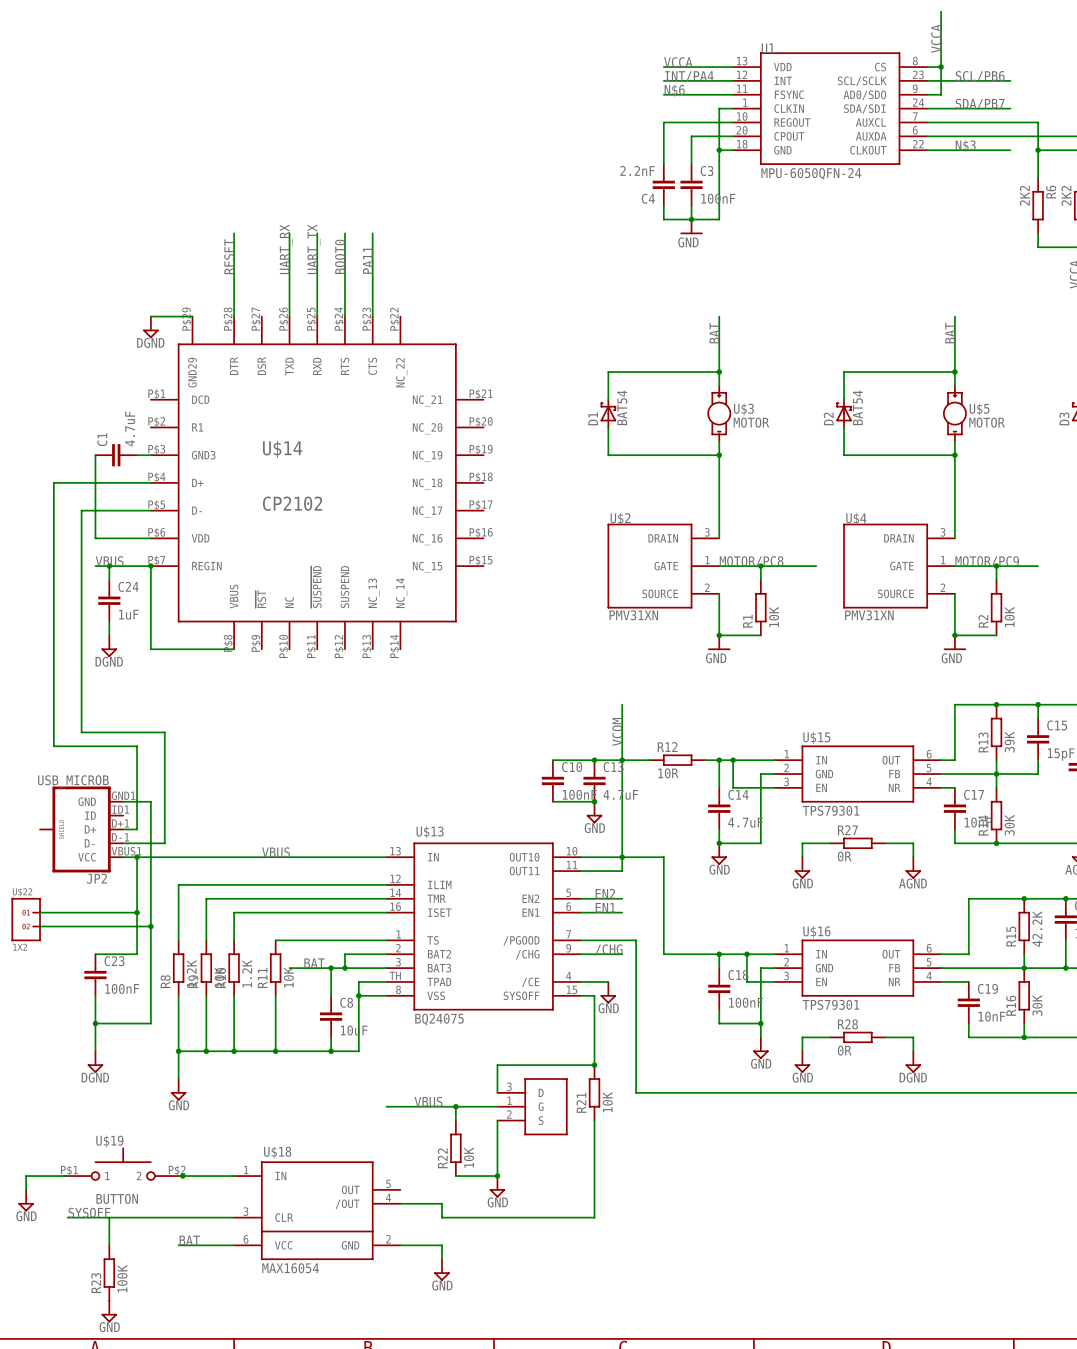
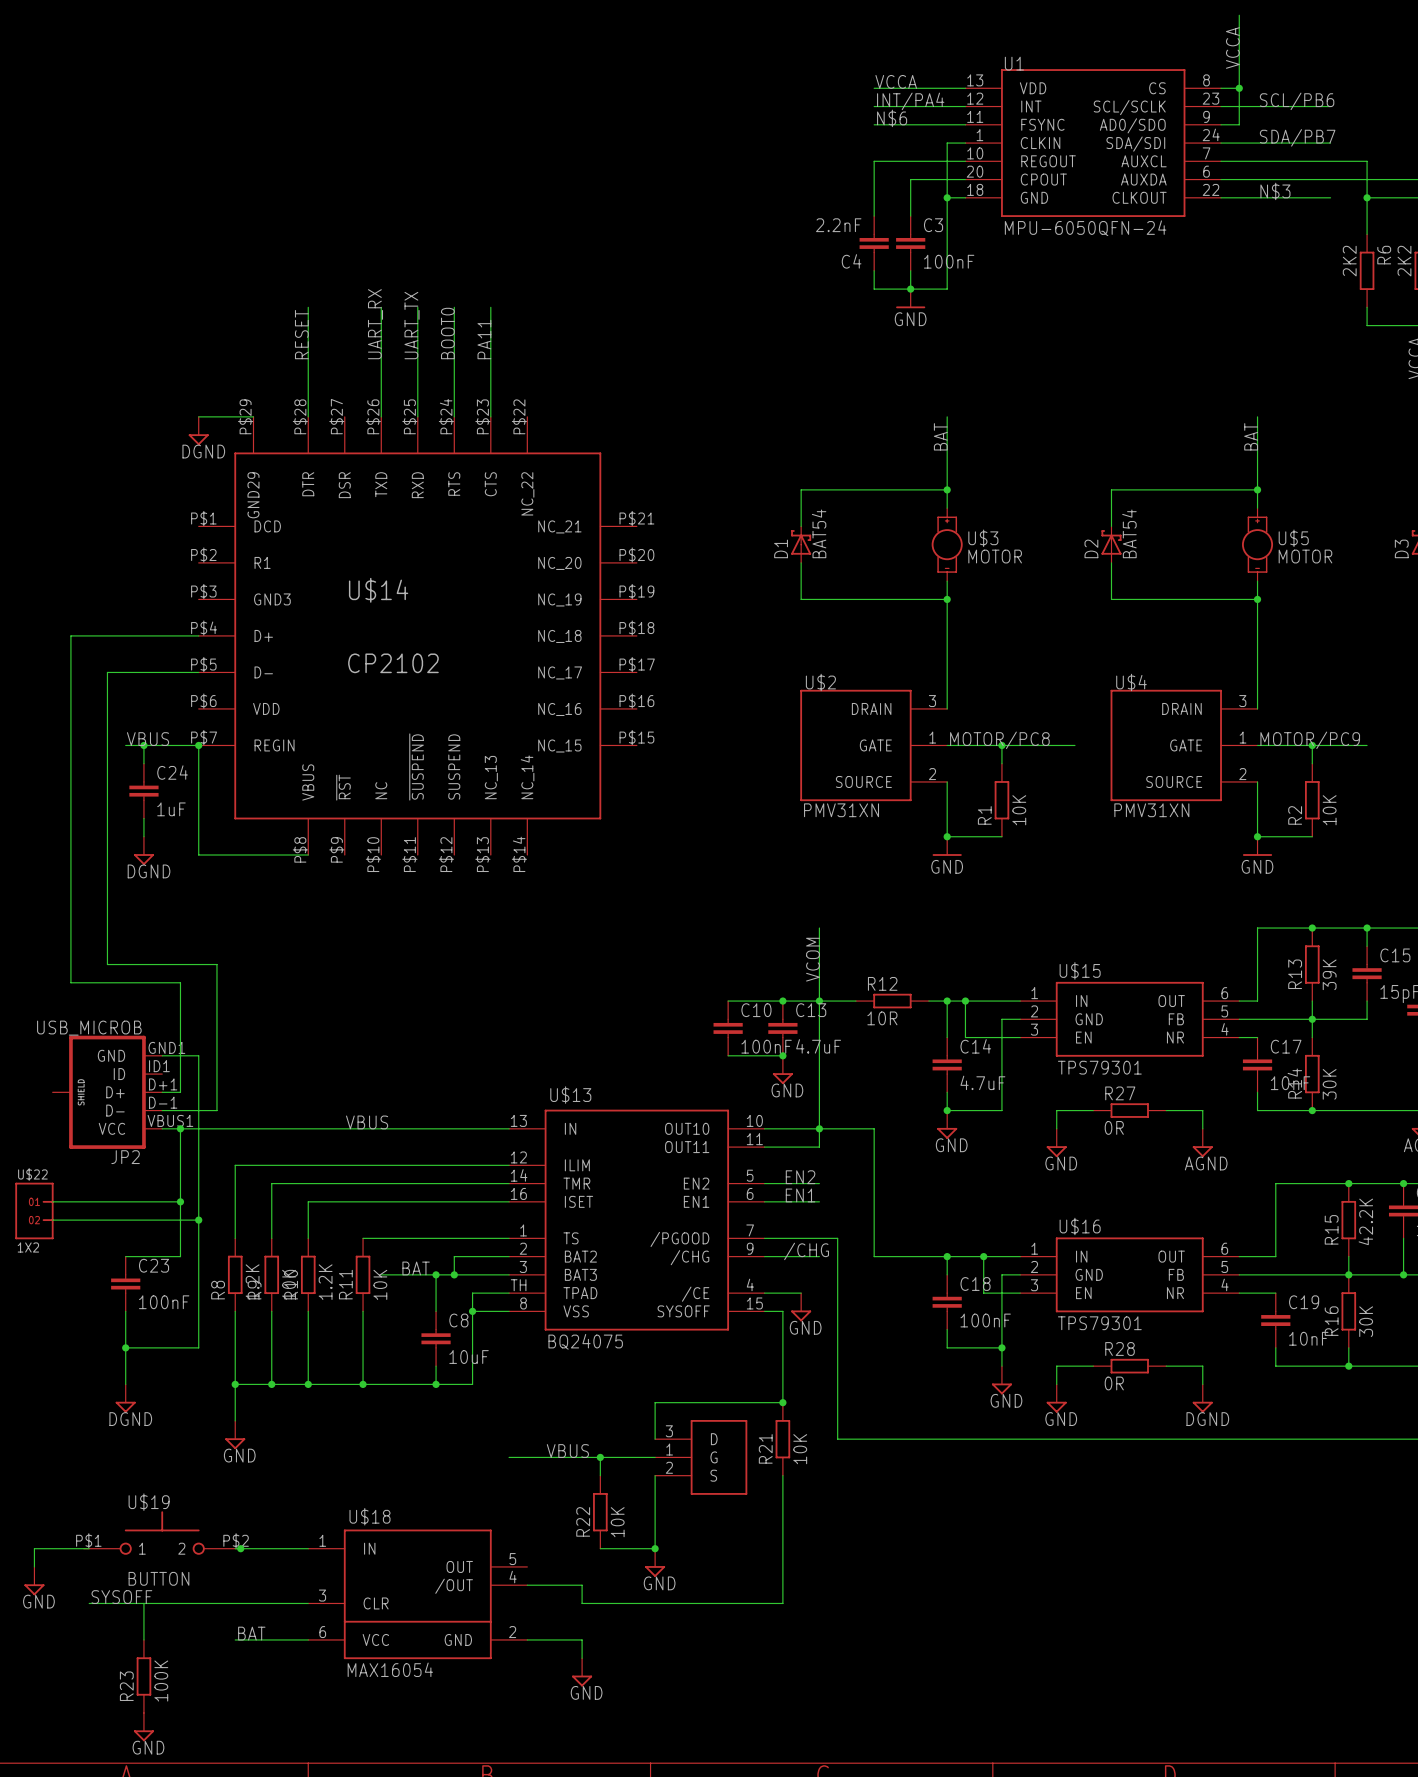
wire: (95, 455) (95, 538) (150, 538) -> none
C1: 4.7uF (116, 455) -> none
wire: (137, 455) (150, 455) -> none

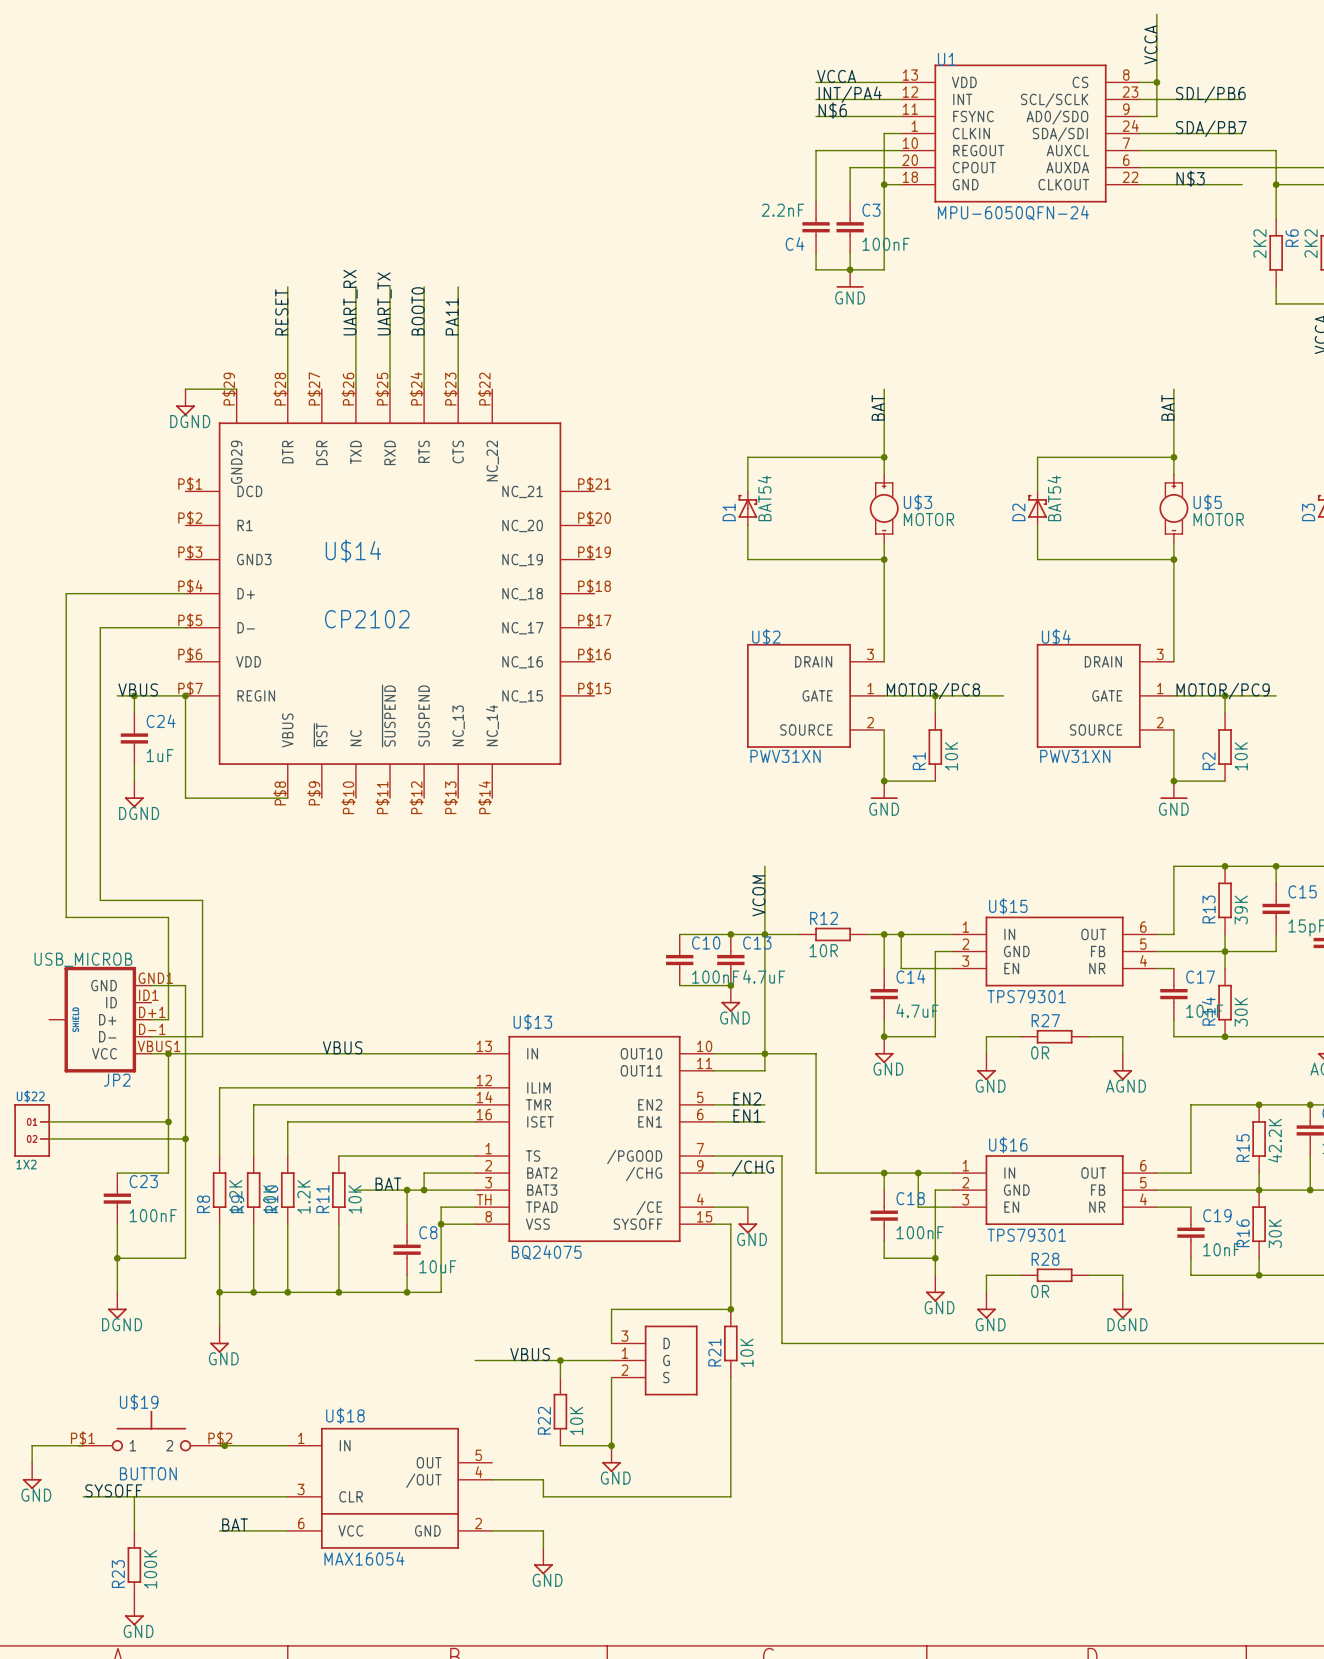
label: SCL/PB6 (1297, 101) -> SDL/PB6 (1210, 94)
U$2 value: PMV31XN (841, 810) -> PWV31XN (785, 756)
U$4 value: PMV31XN (1151, 810) -> PWV31XN (1075, 756)

